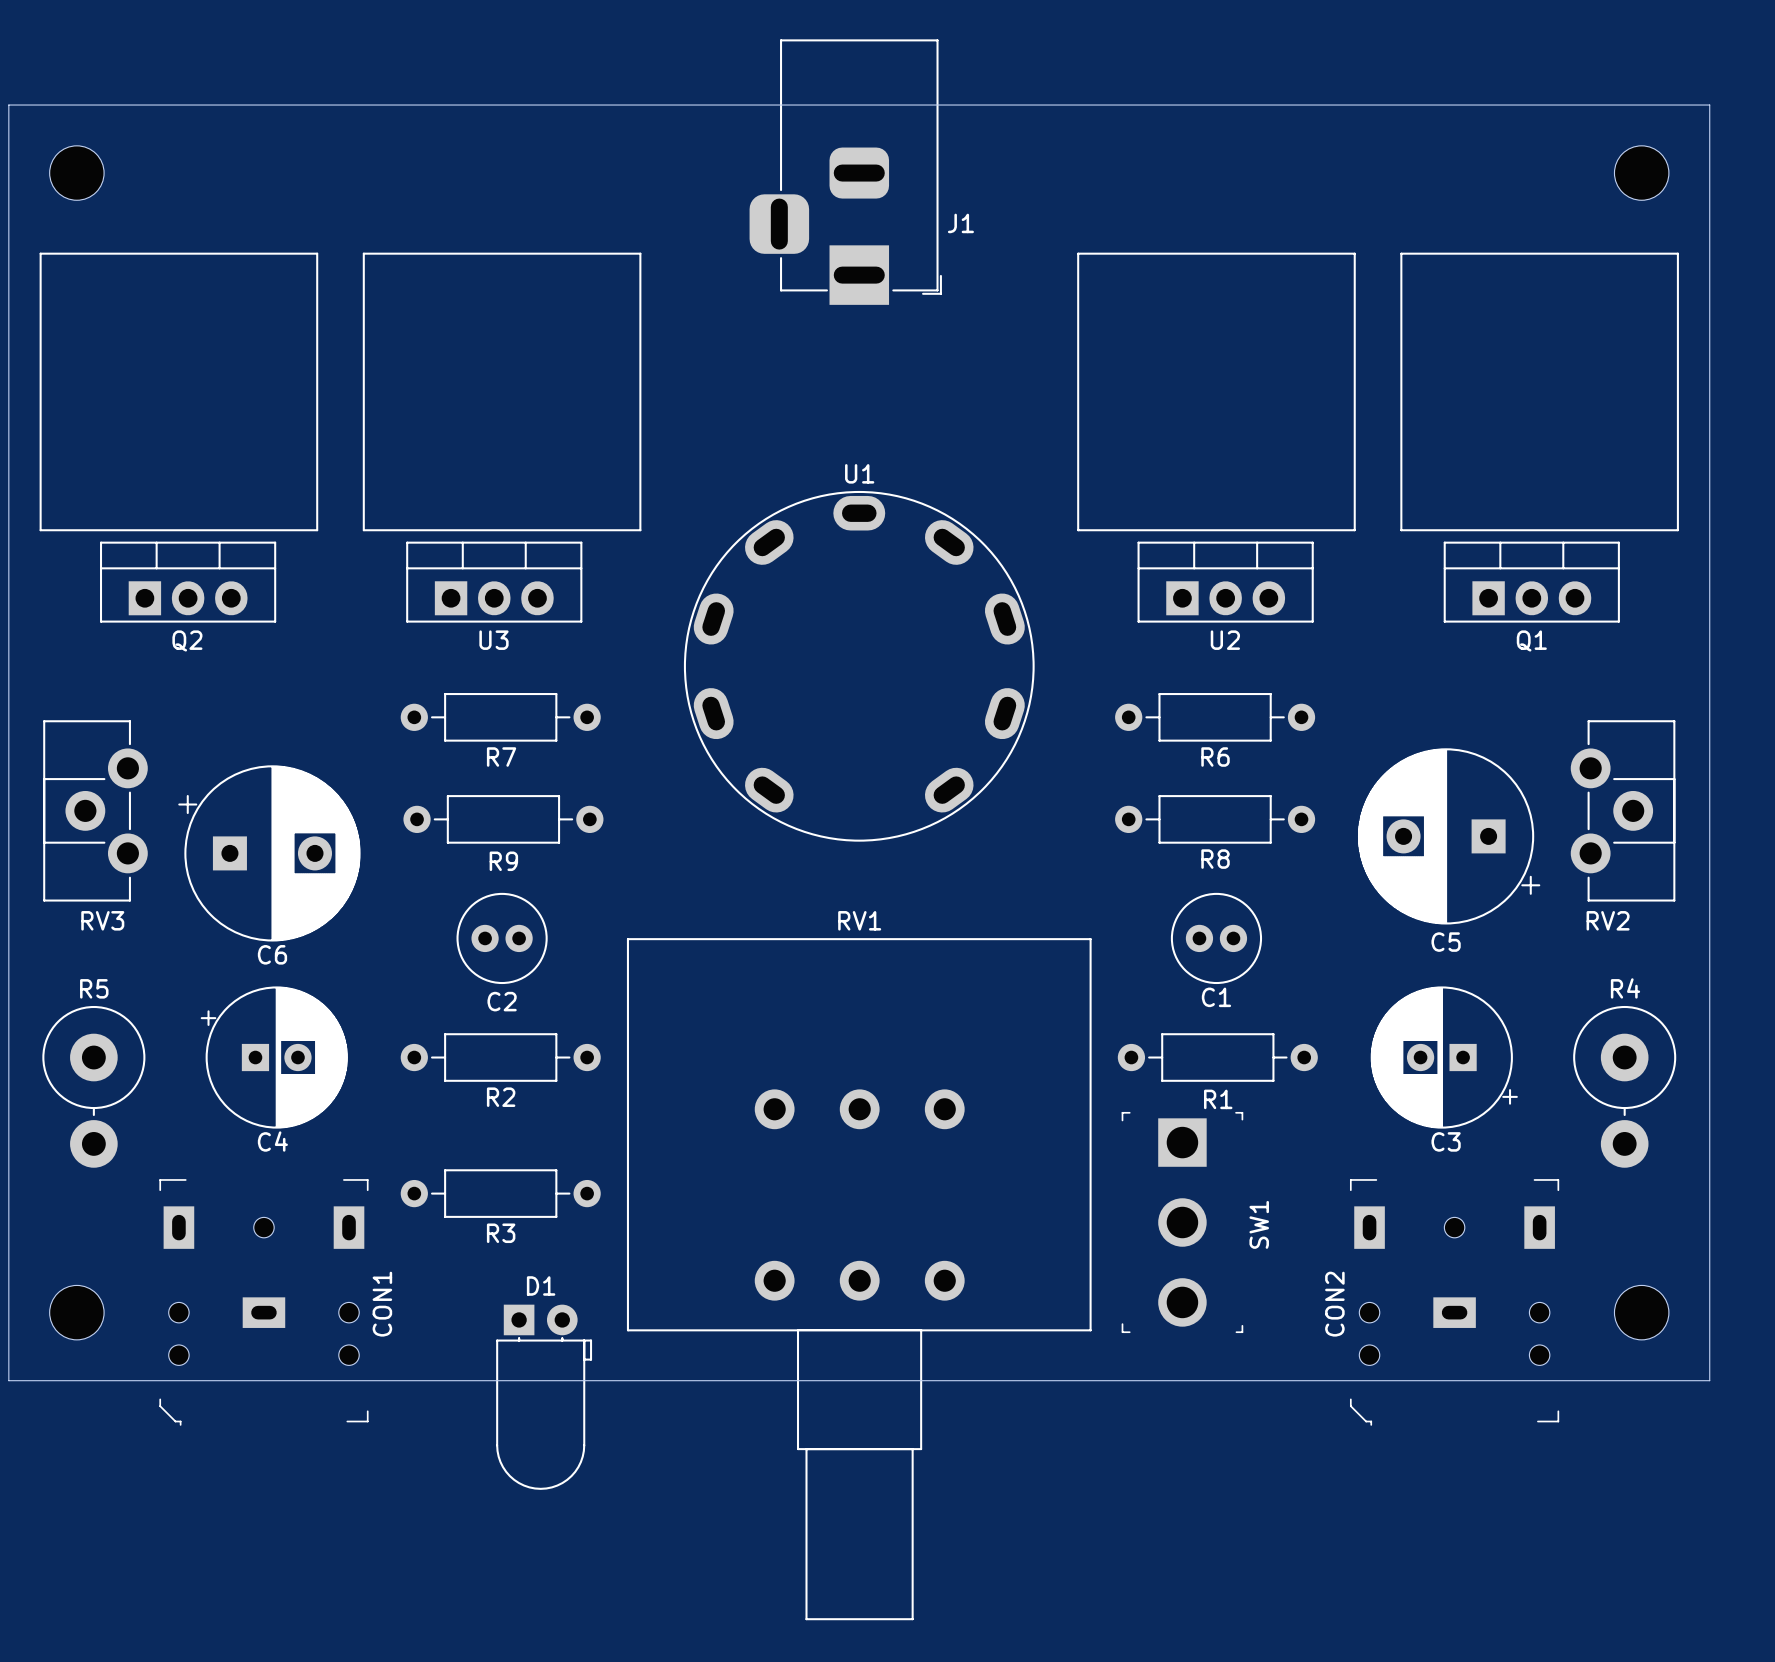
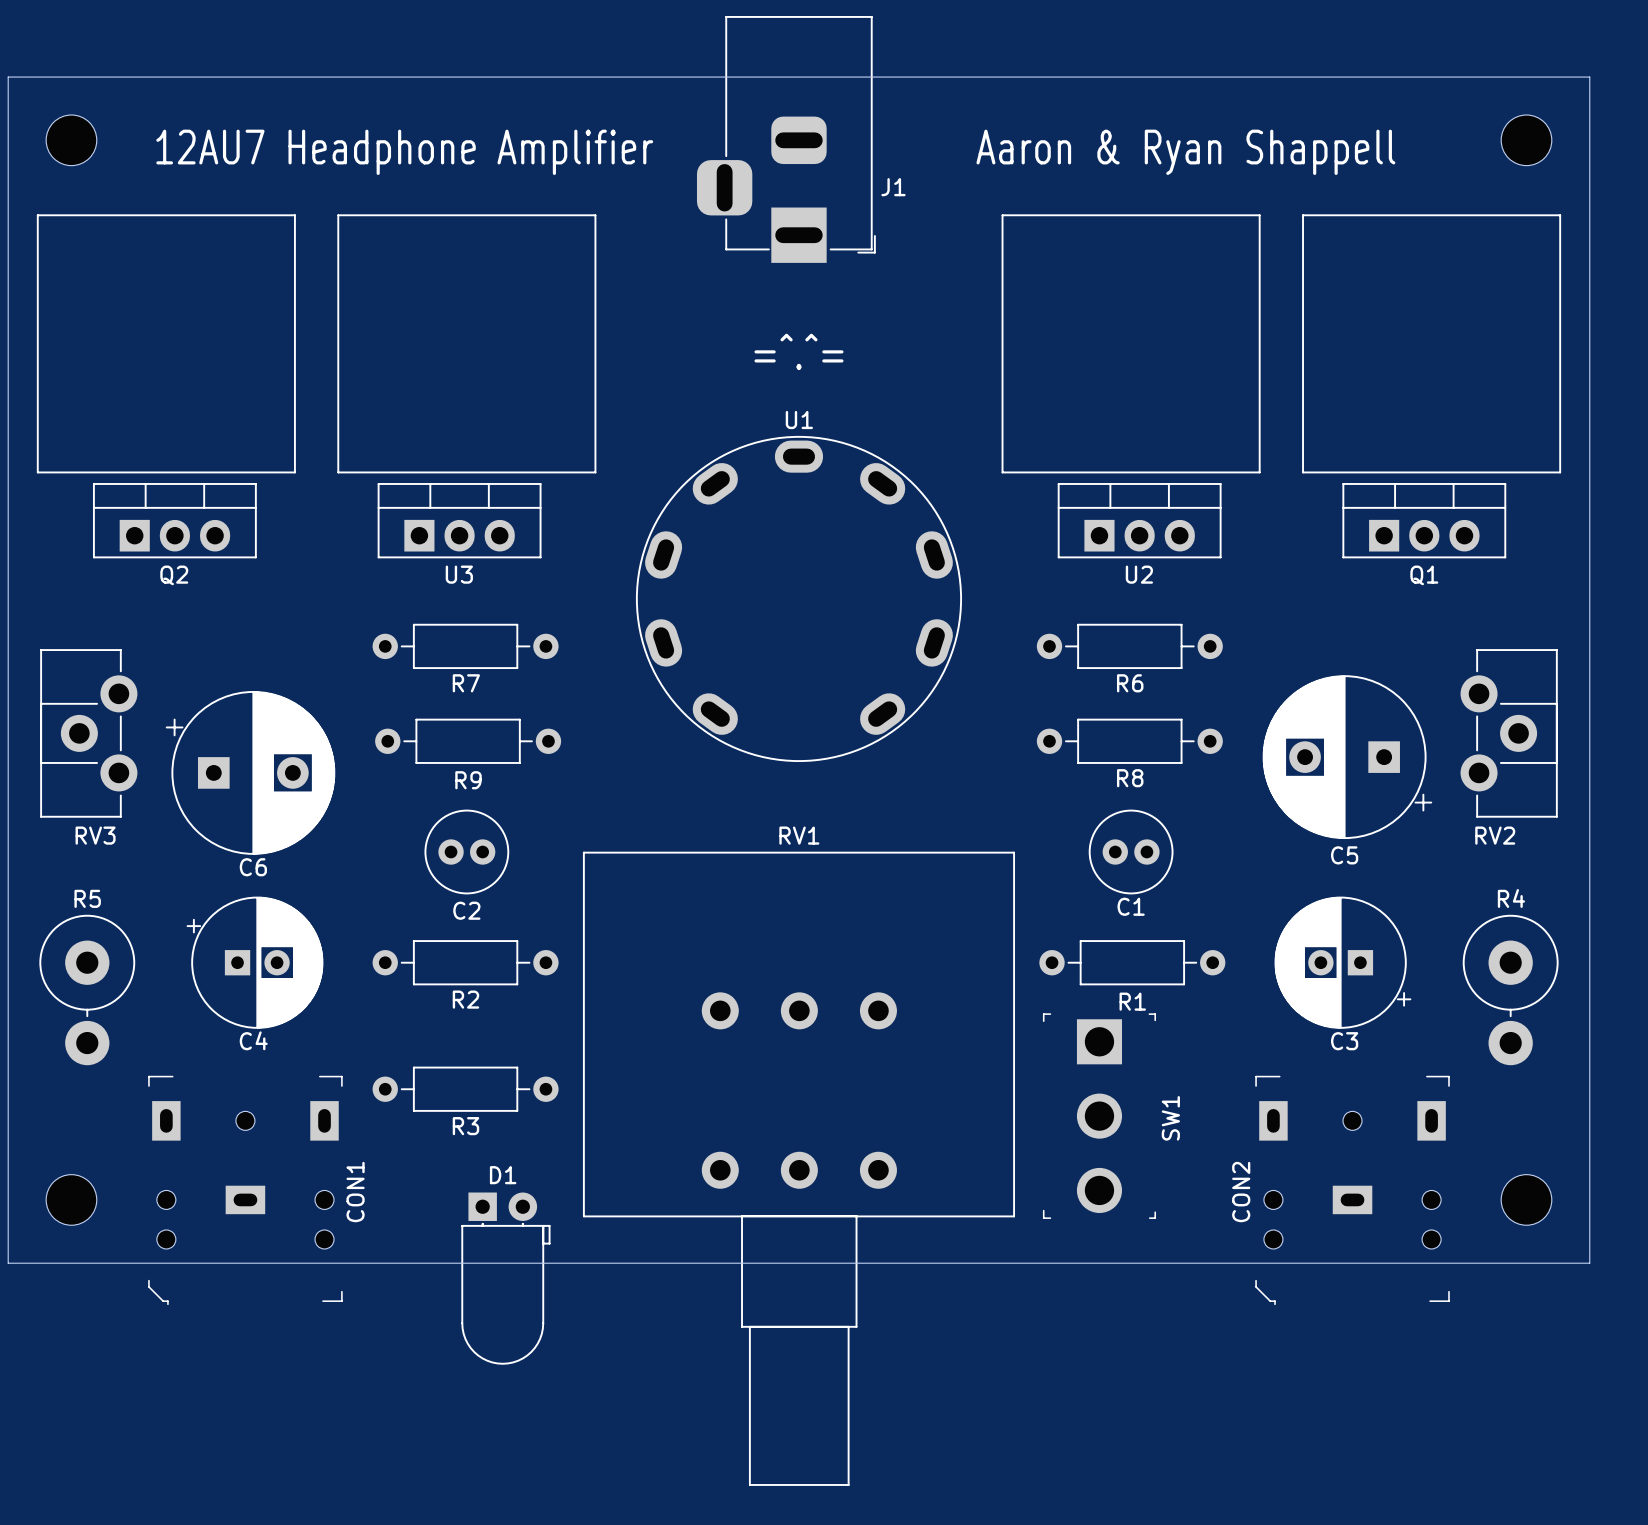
text: none -> 12AU7 Headphone Amplifier (404, 152)
text: none -> Aaron & Ryan Shappell (1185, 152)
text: none -> =^.^= (798, 351)

